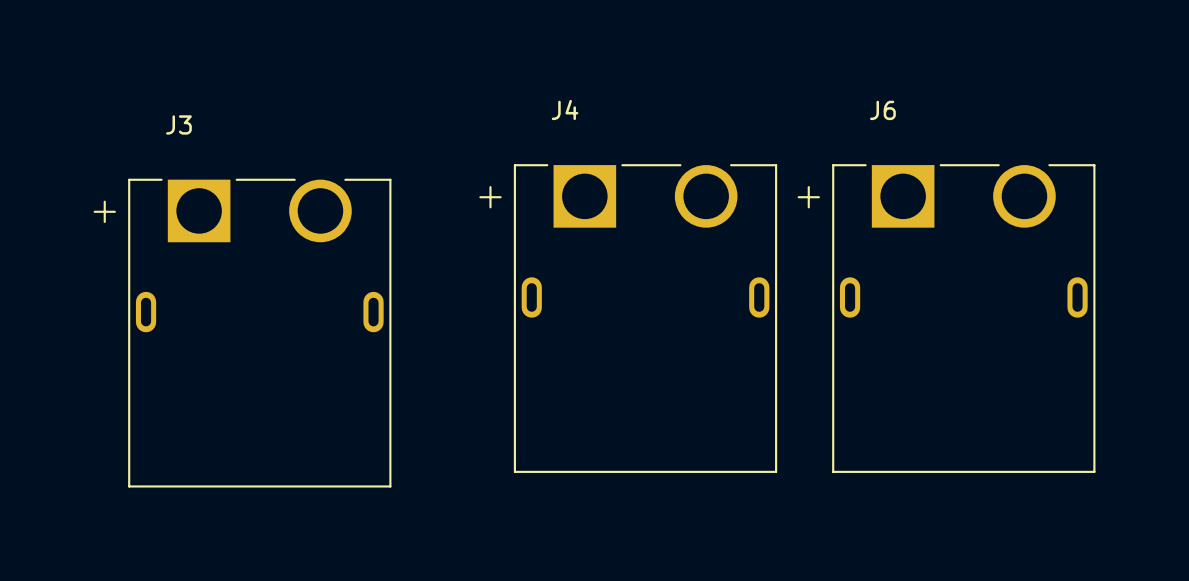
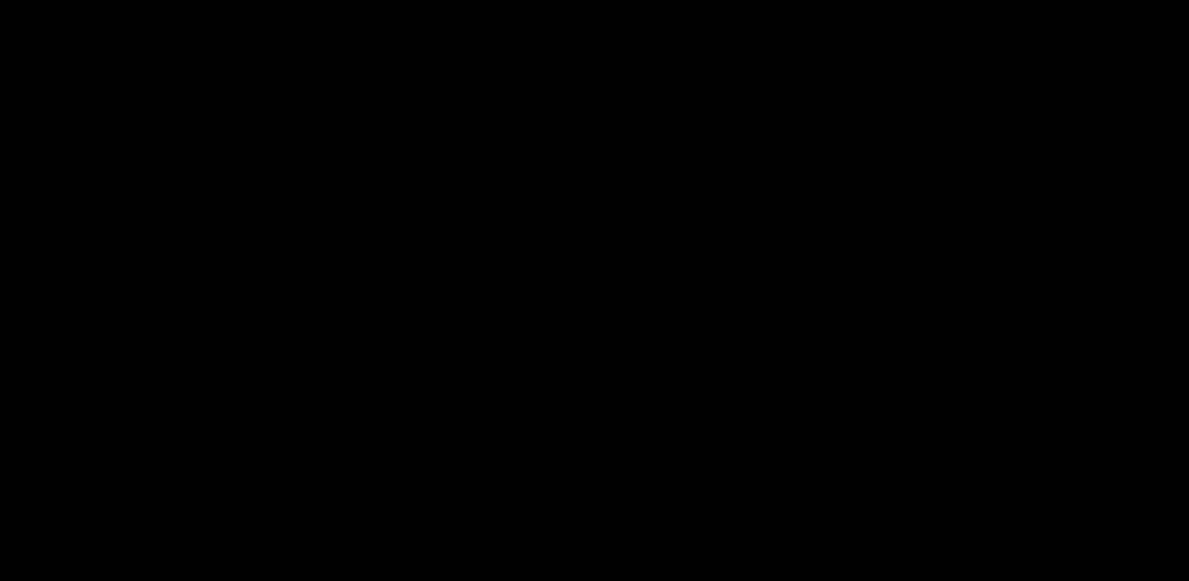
J4: (628, 318) -> none
J6: (946, 318) -> none
J3: (242, 333) -> none

